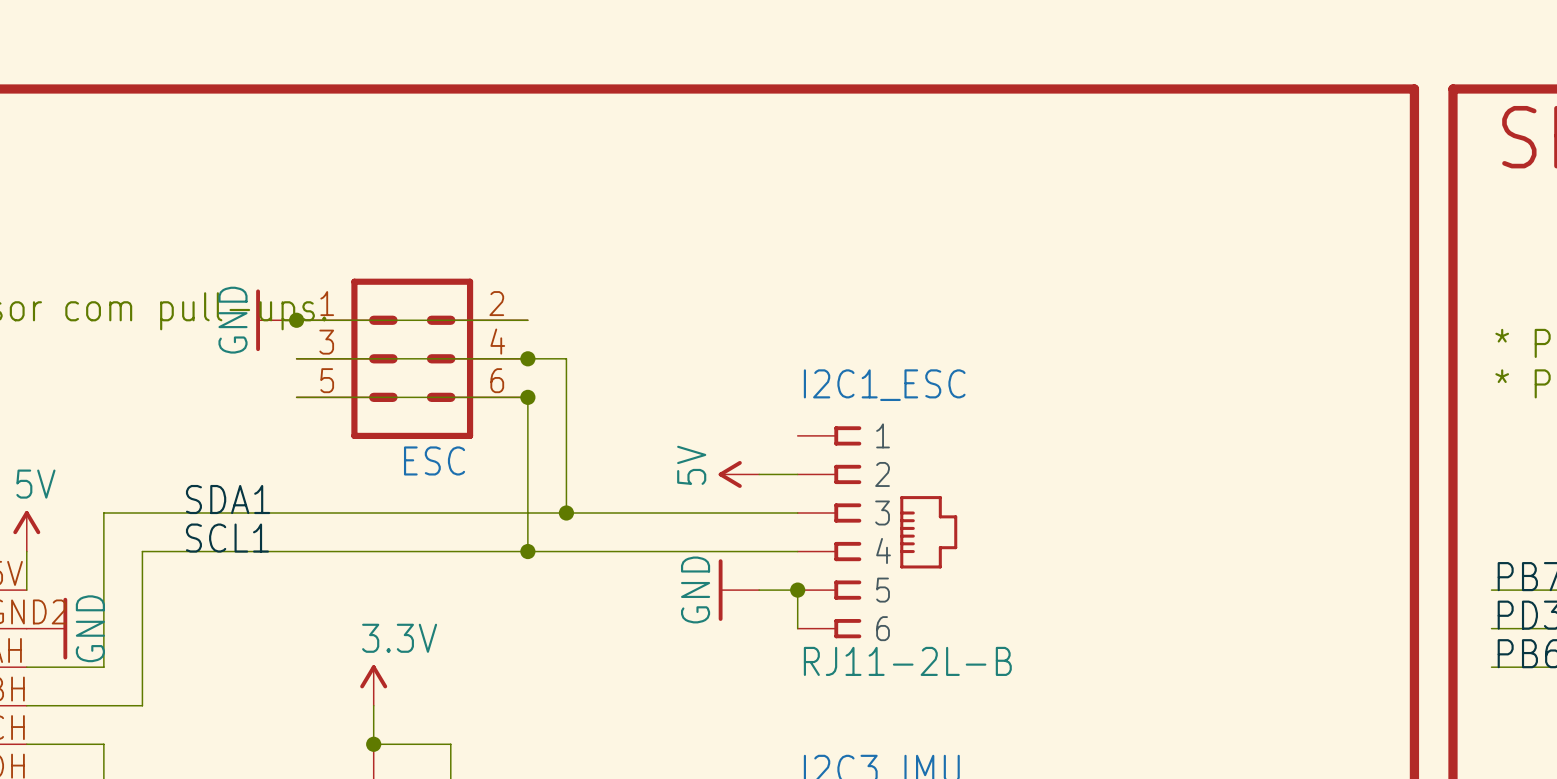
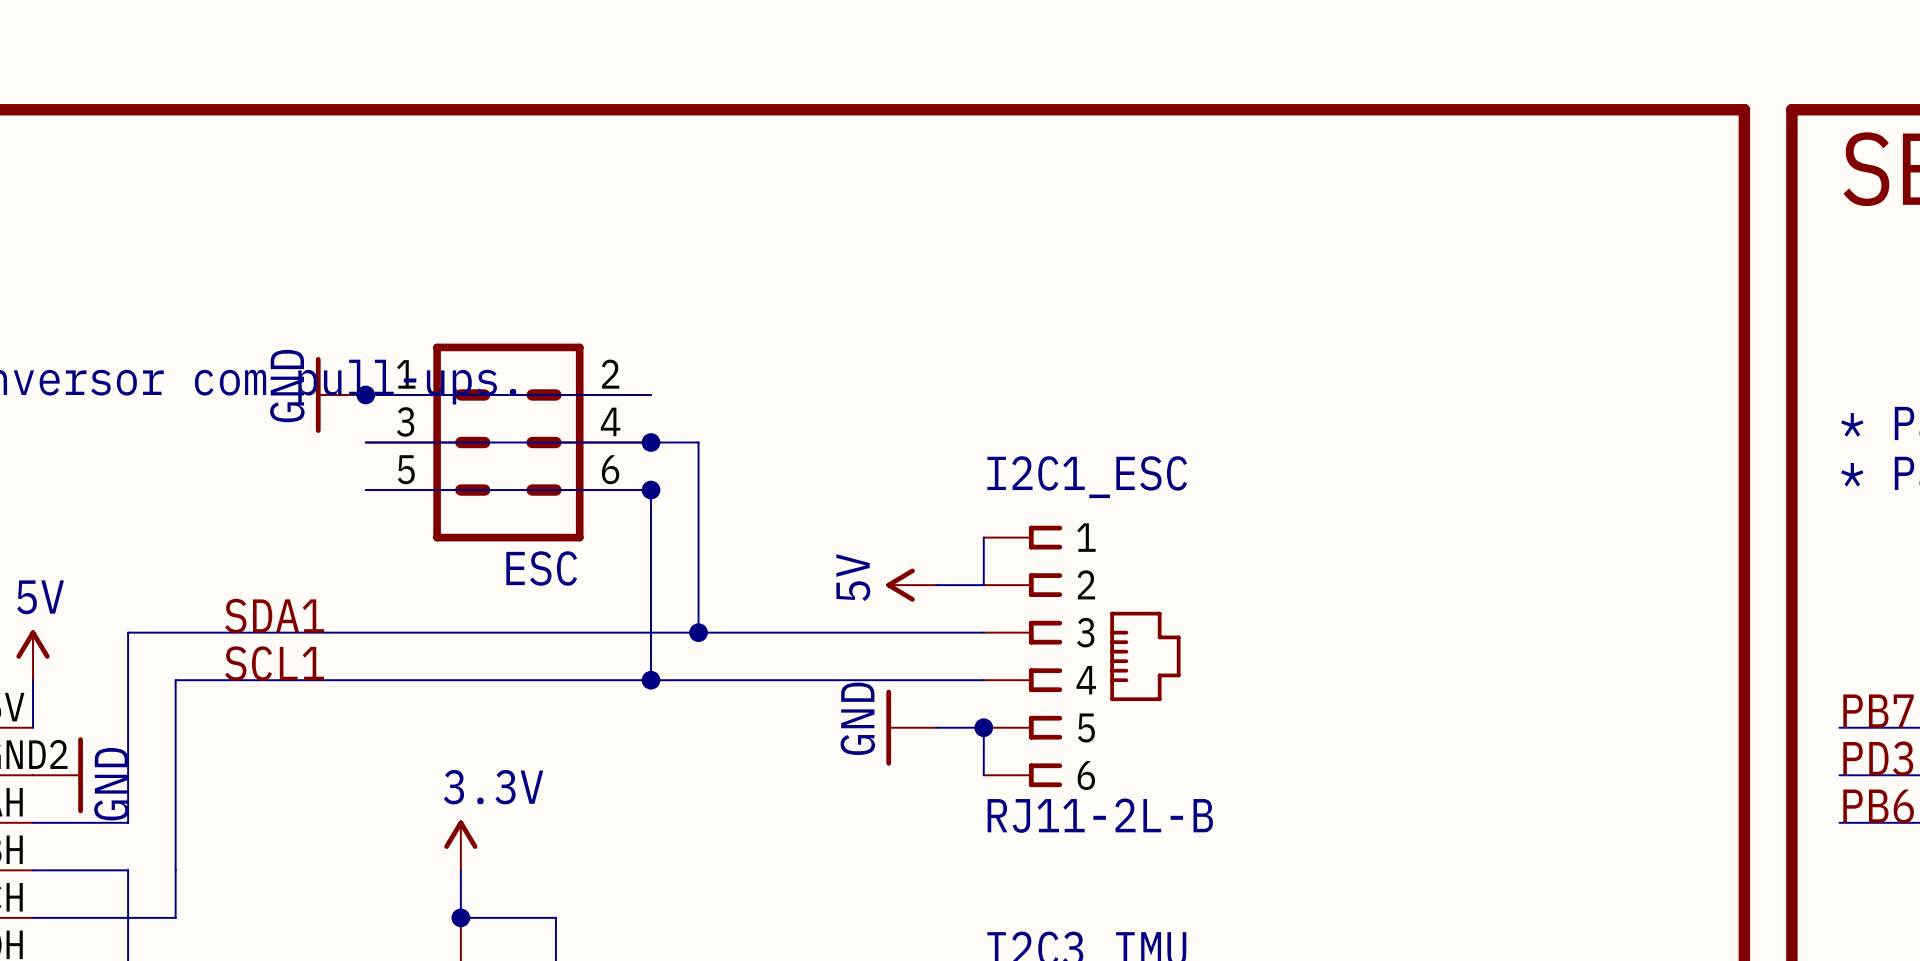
wire: none -> (983, 537) (983, 585)
wire: (103, 705) (142, 705) -> (128, 870) (128, 917) (175, 917) (175, 870)

